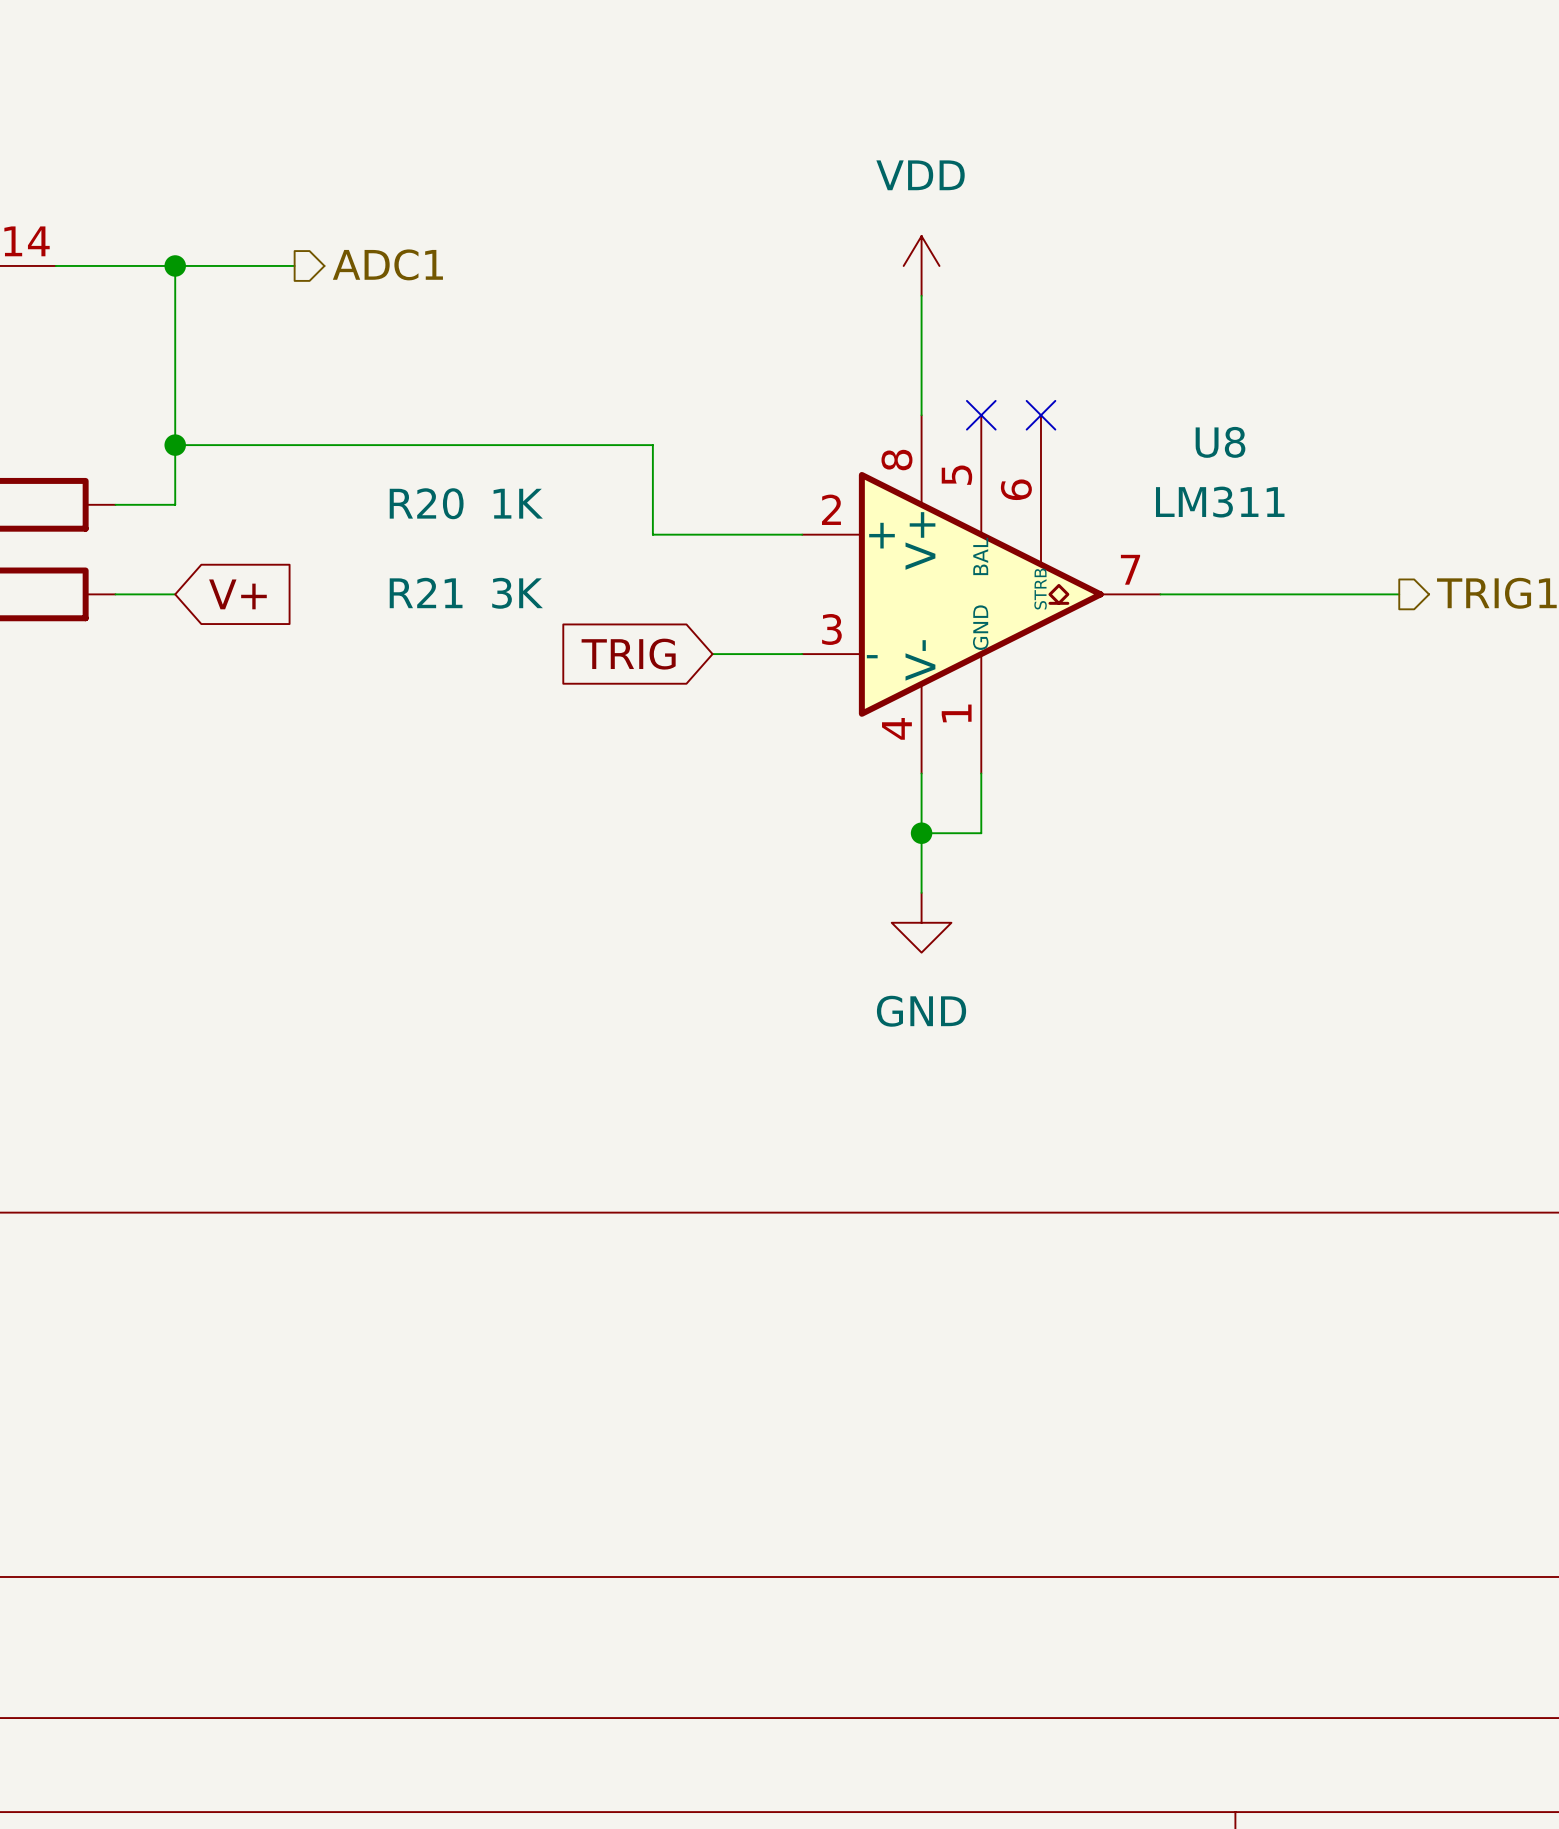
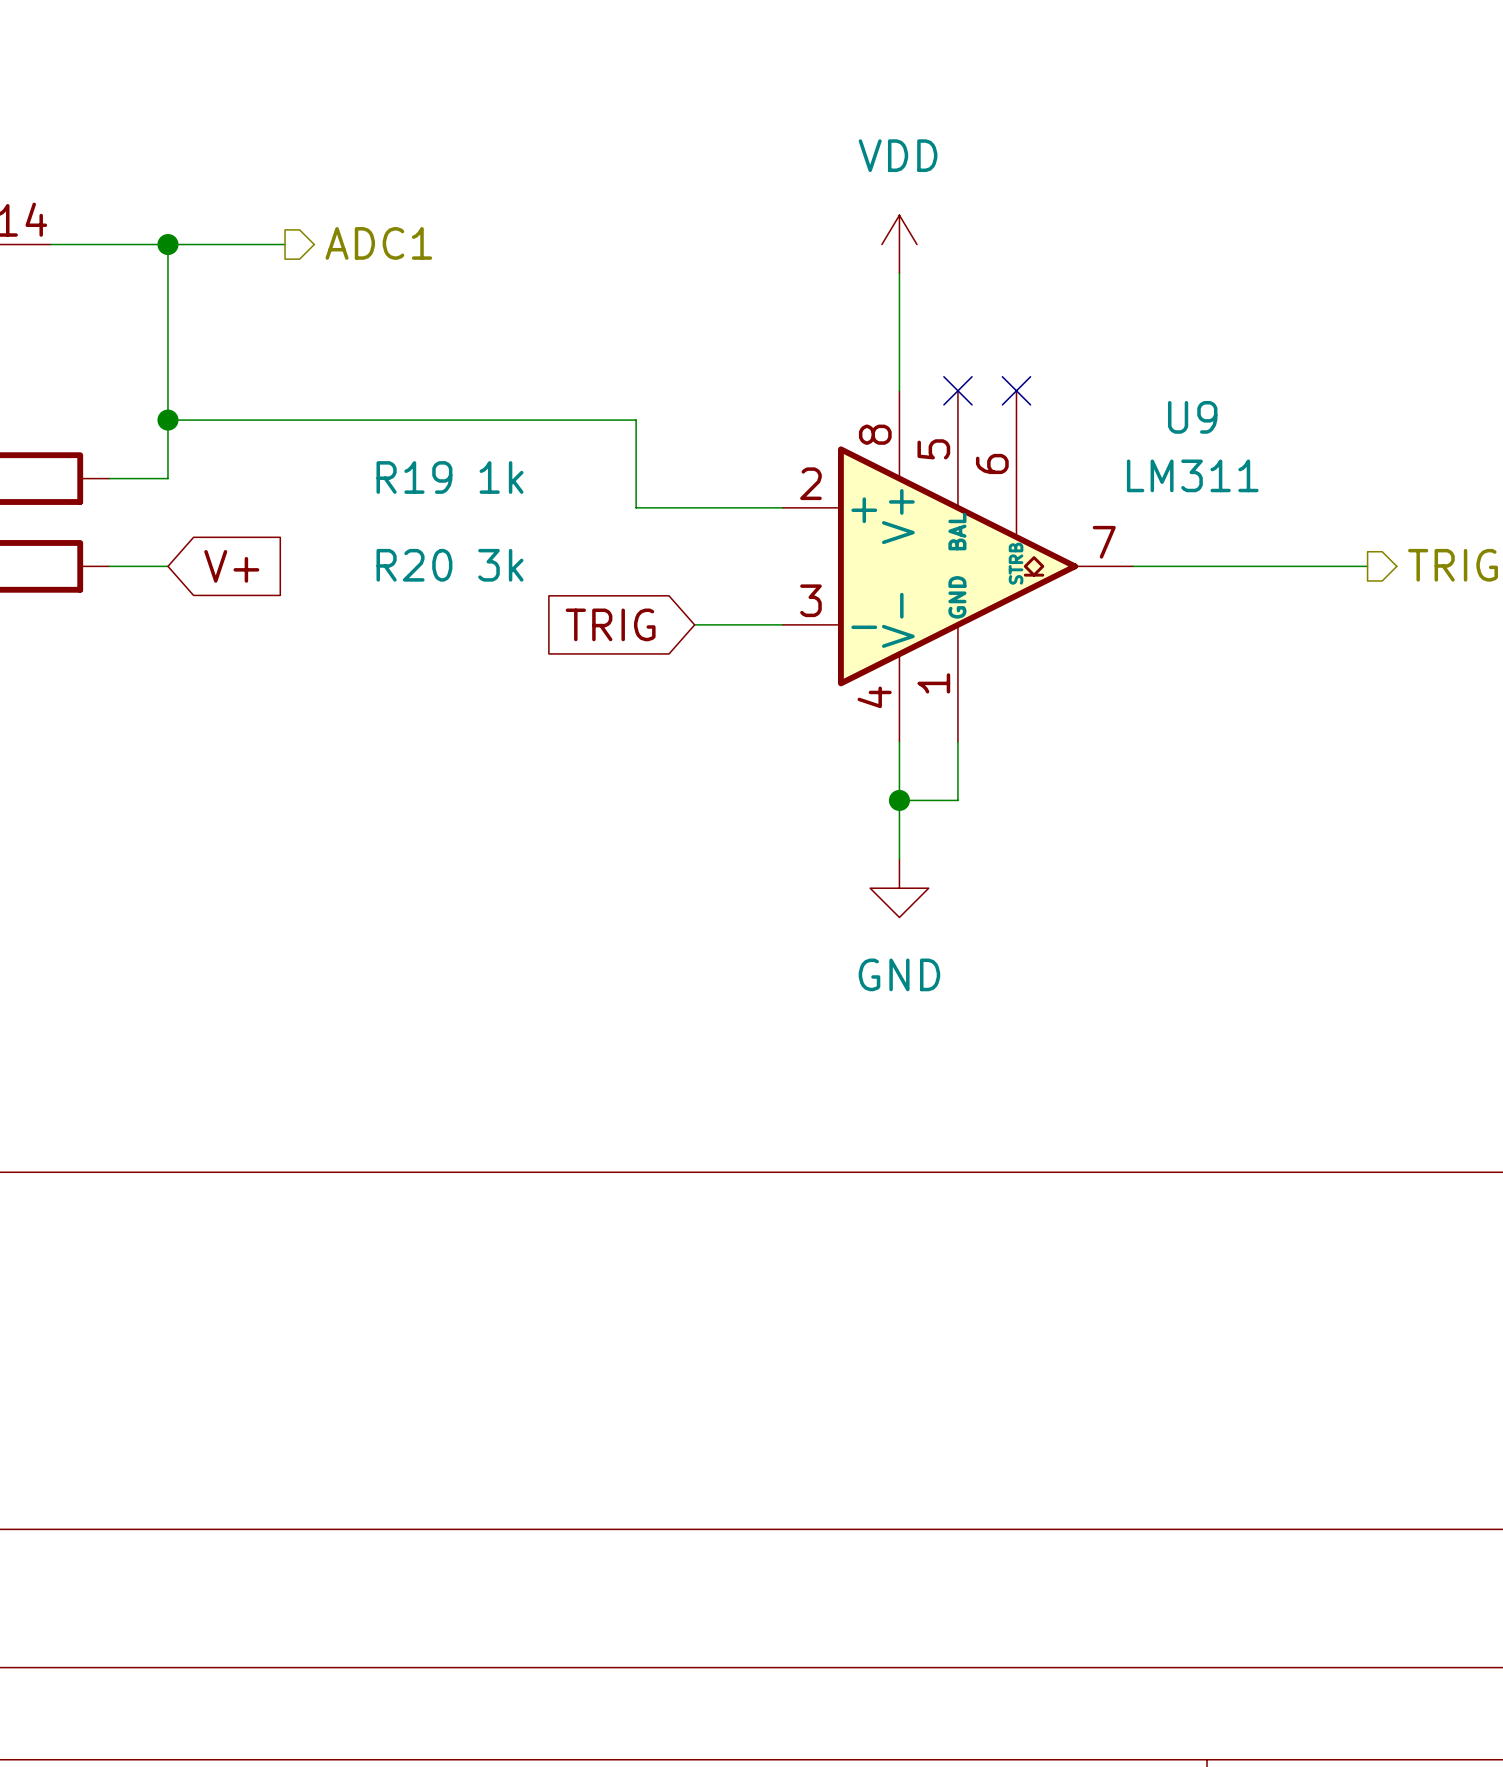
U8 name: U8 (1220, 442) -> U9 (1192, 417)
R20 name: R20 (426, 503) -> R19 (414, 477)
R20 value: 1K (518, 503) -> 1k (501, 477)
R21 name: R21 (426, 592) -> R20 (414, 565)
R21 value: 3K (517, 593) -> 3k (500, 565)

